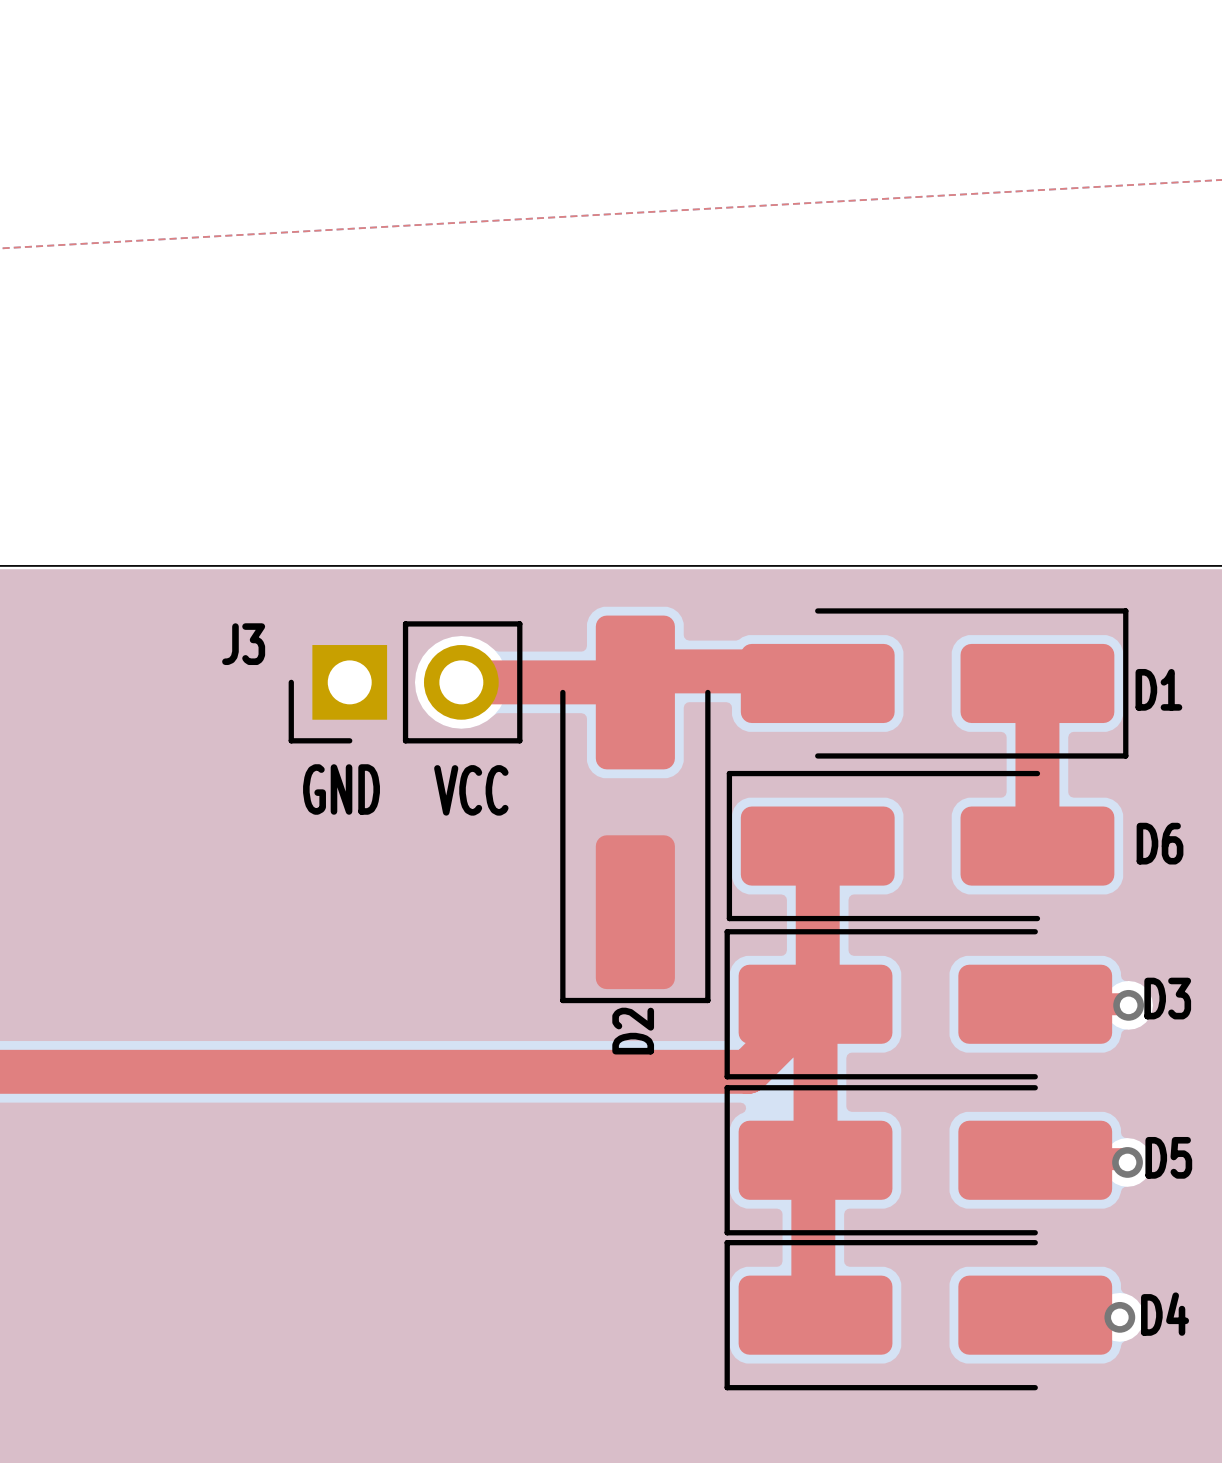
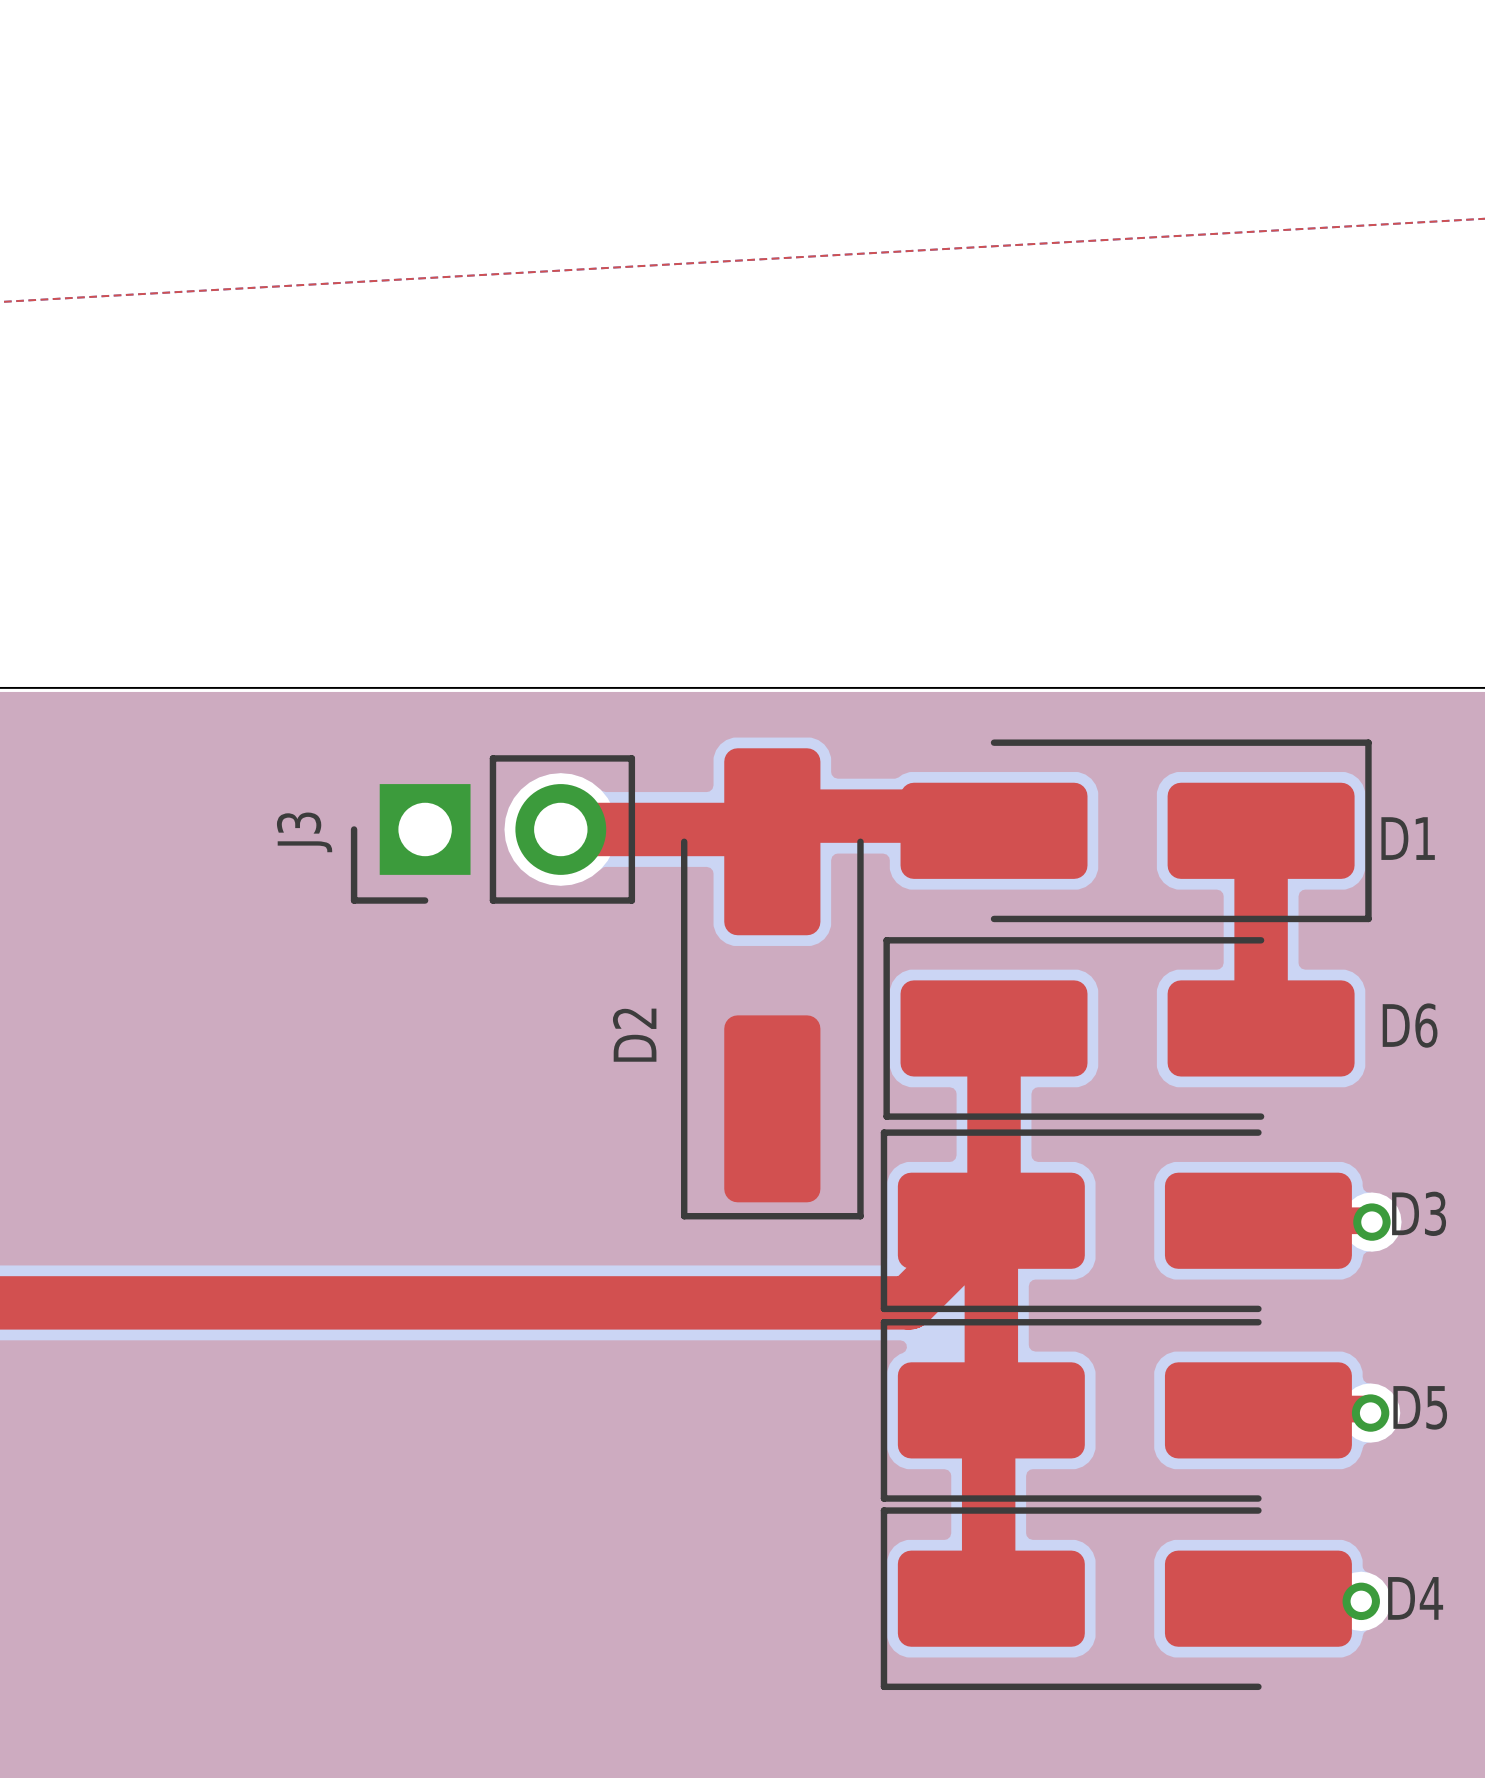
J3 name rotation: 0° (243, 644) -> 90° counterclockwise (304, 832)
text: GND (341, 789) -> none
text: VCC (471, 790) -> none
D2 name position: D2 (633, 1031) -> D2 (634, 1035)

